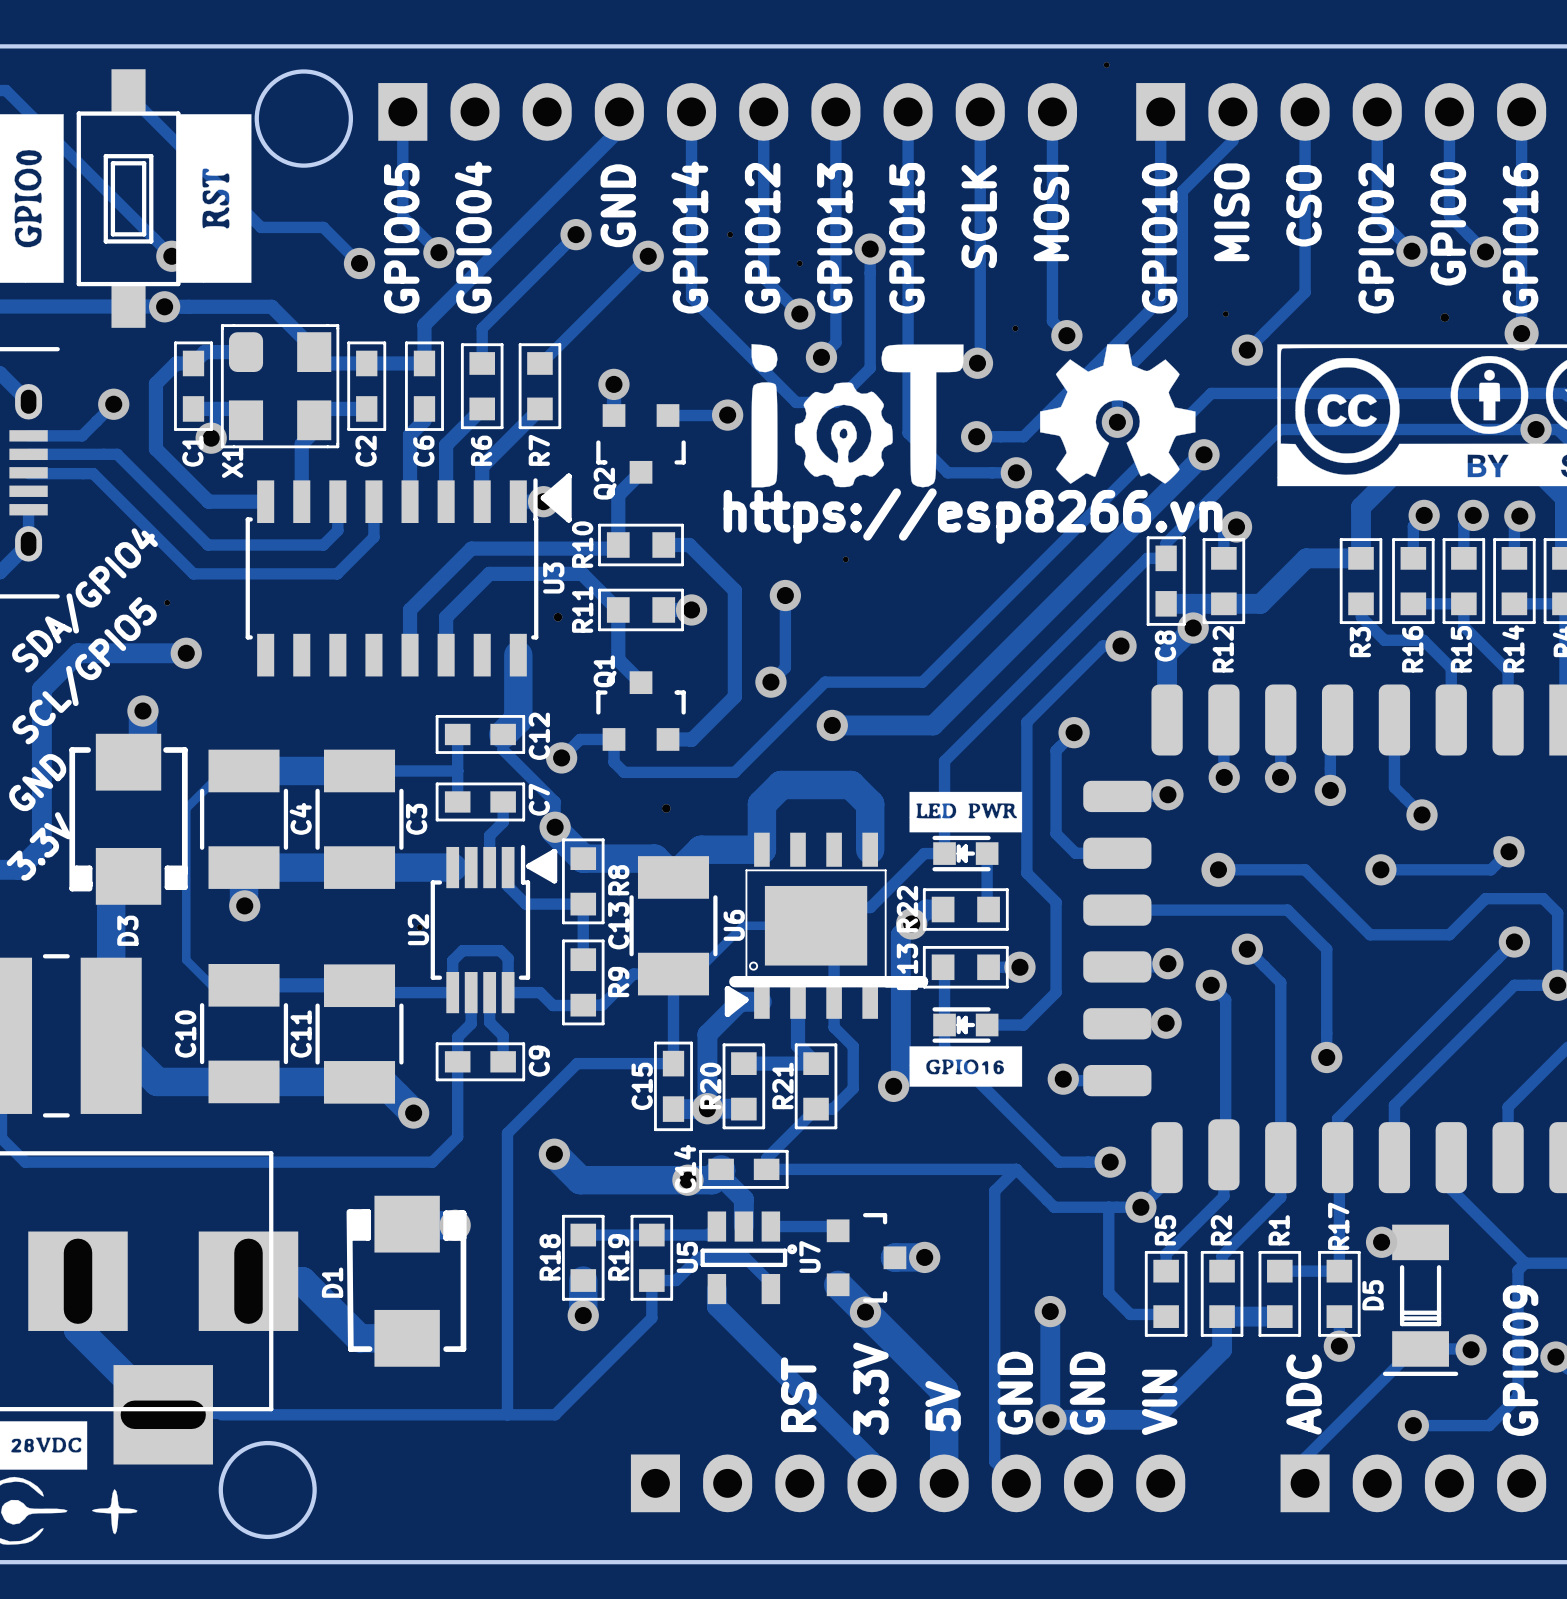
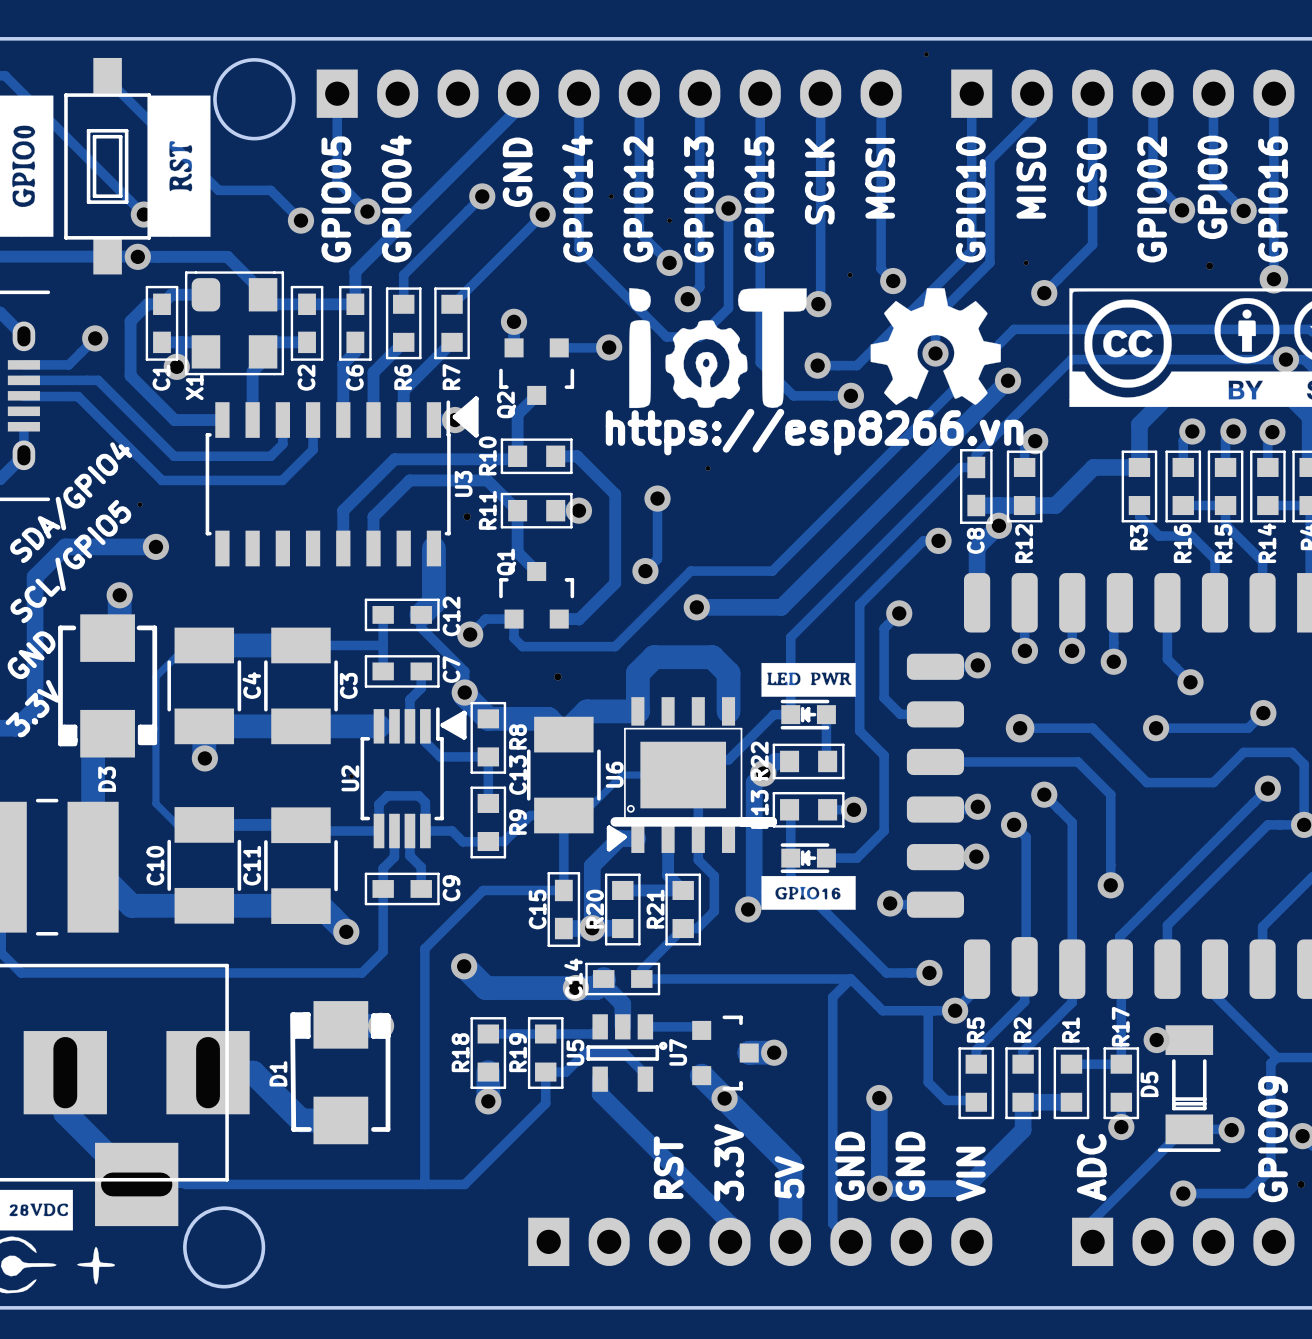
part: none -> (1301, 1184)

